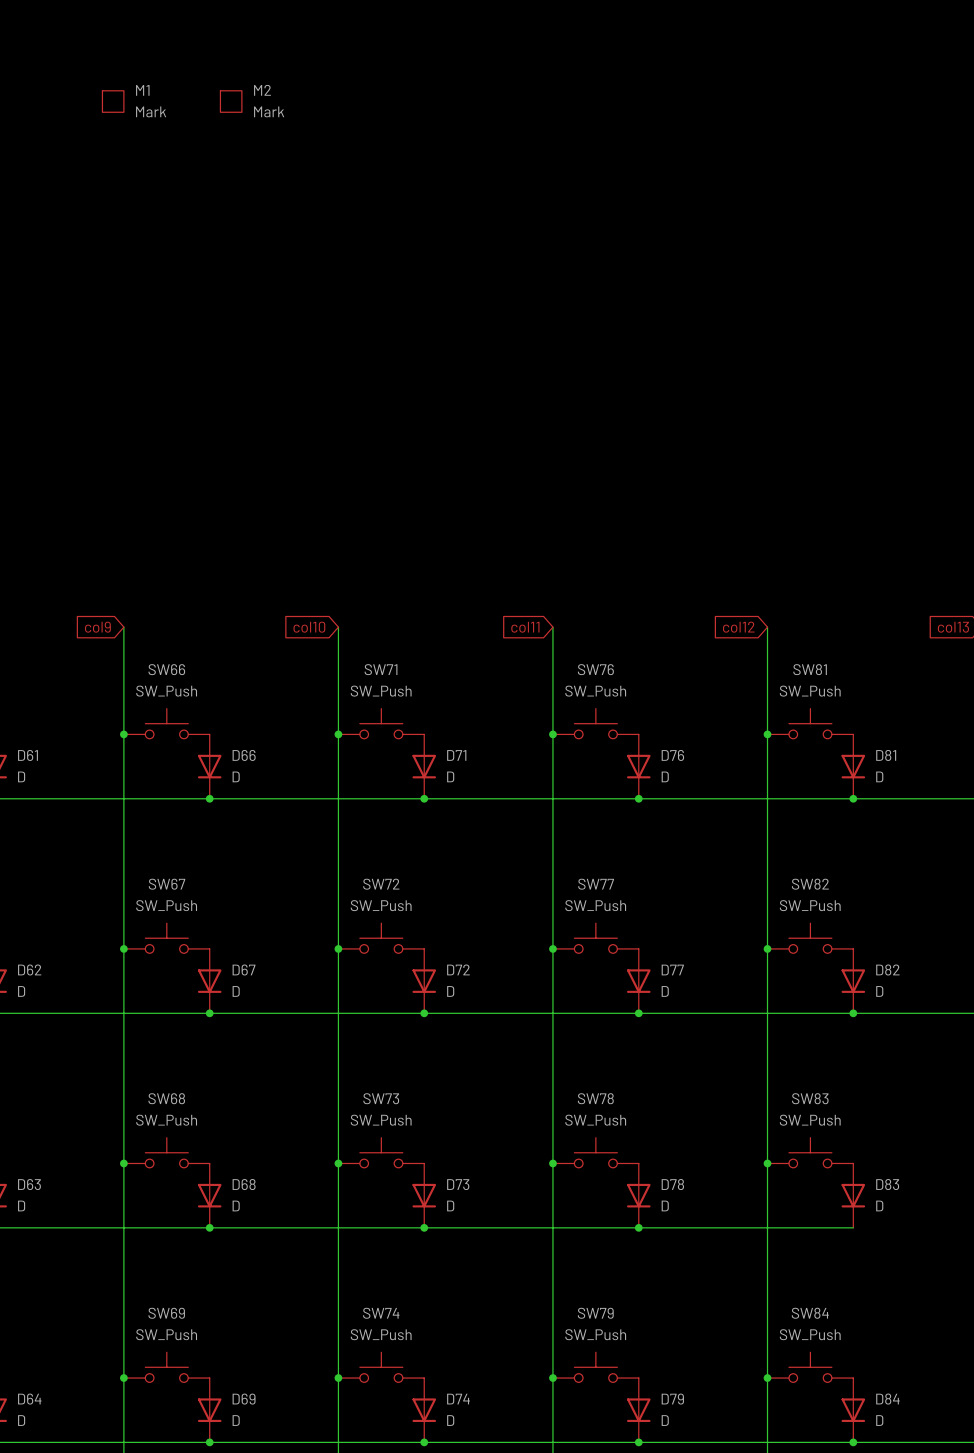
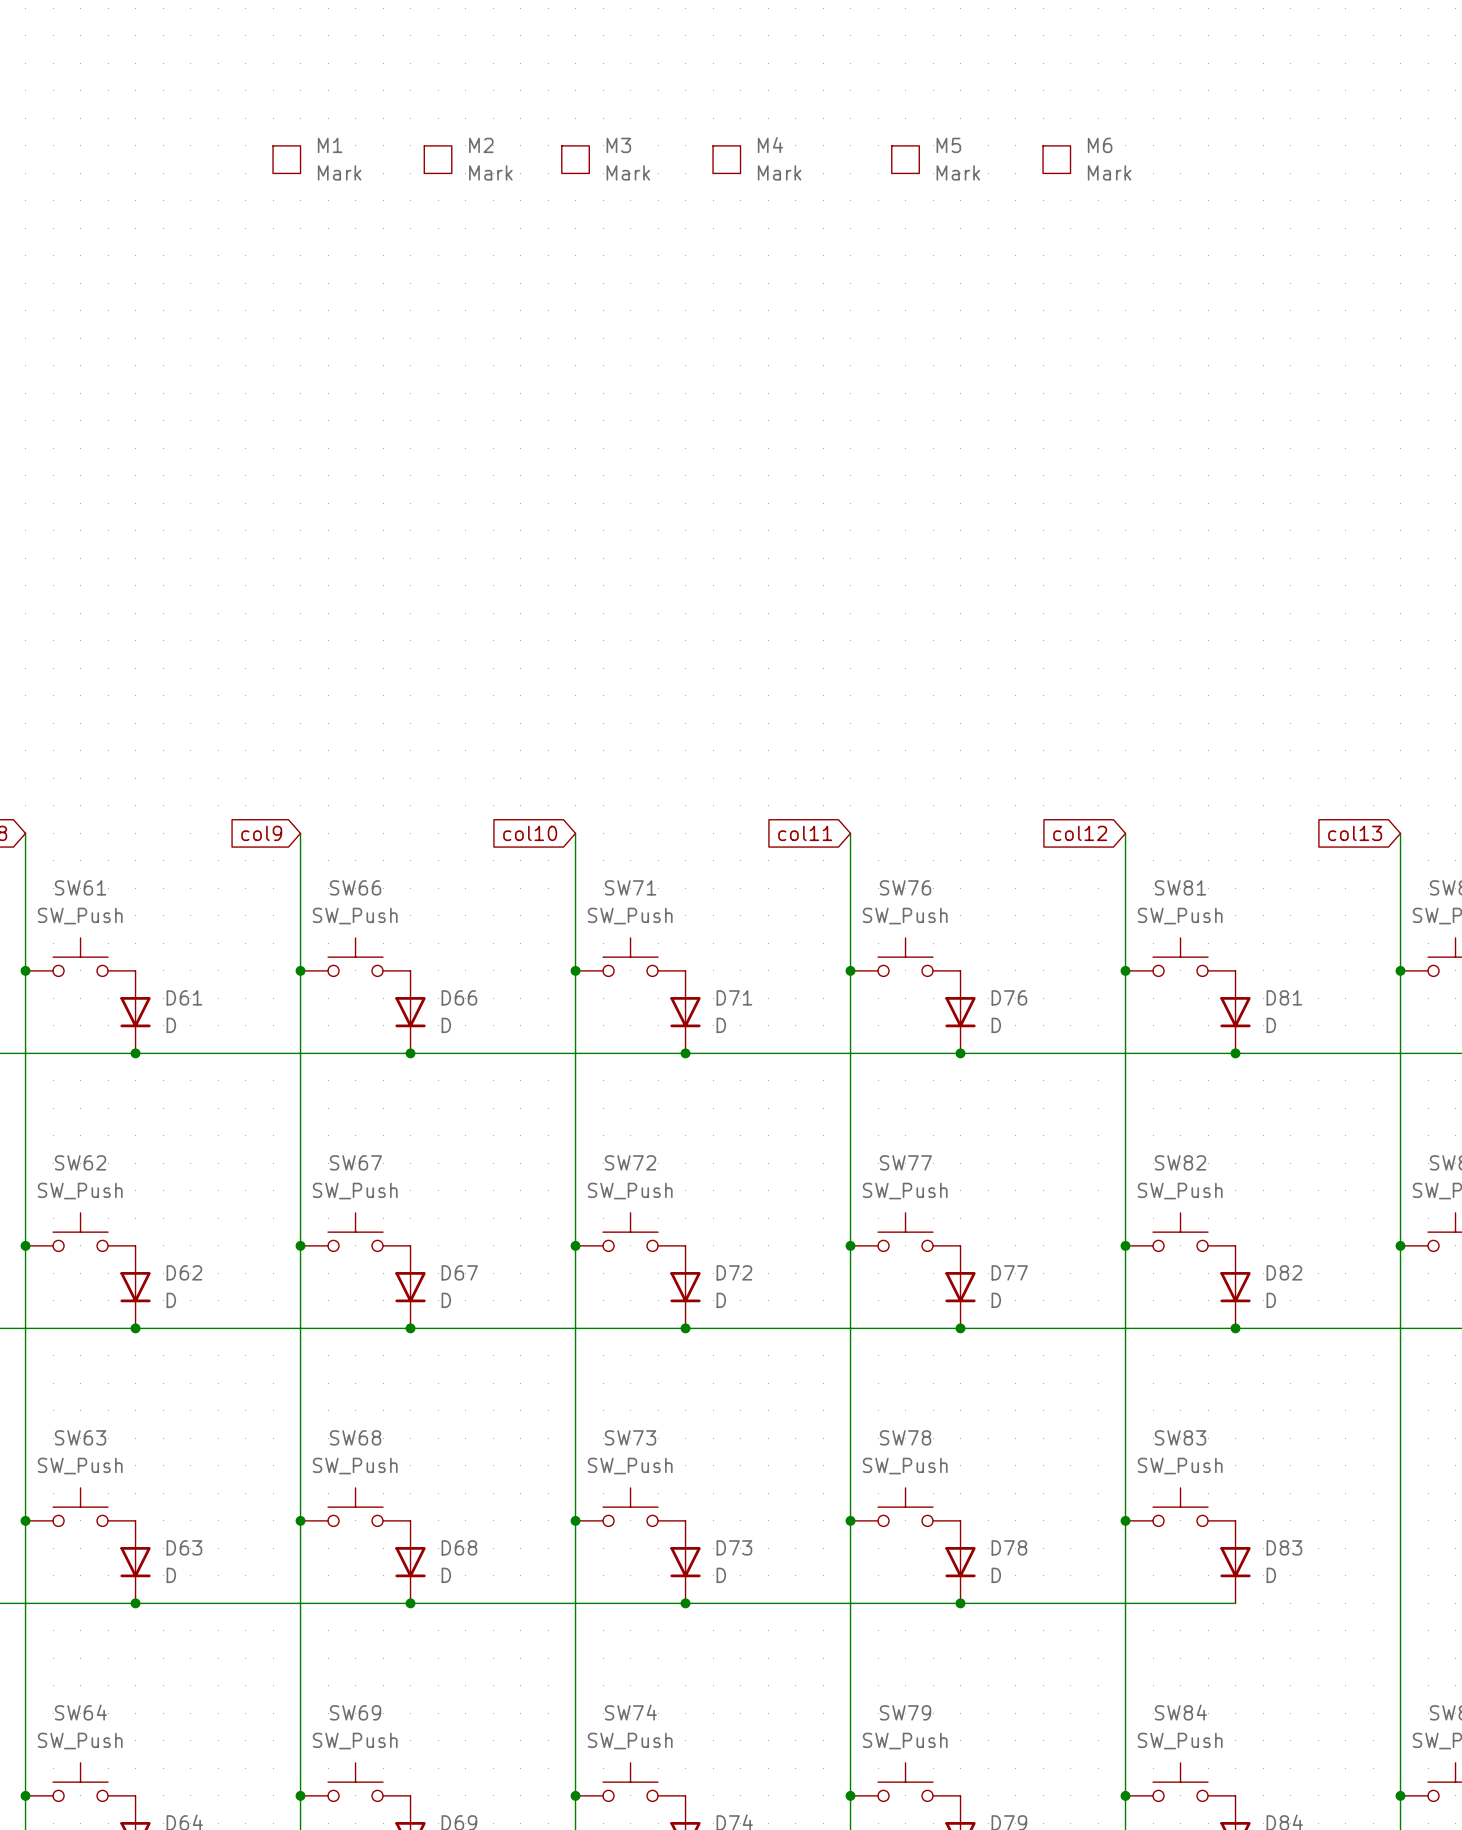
M3: none -> Mark (575, 159)
M4: none -> Mark (726, 159)
M5: none -> Mark (905, 159)
M6: none -> Mark (1056, 159)

